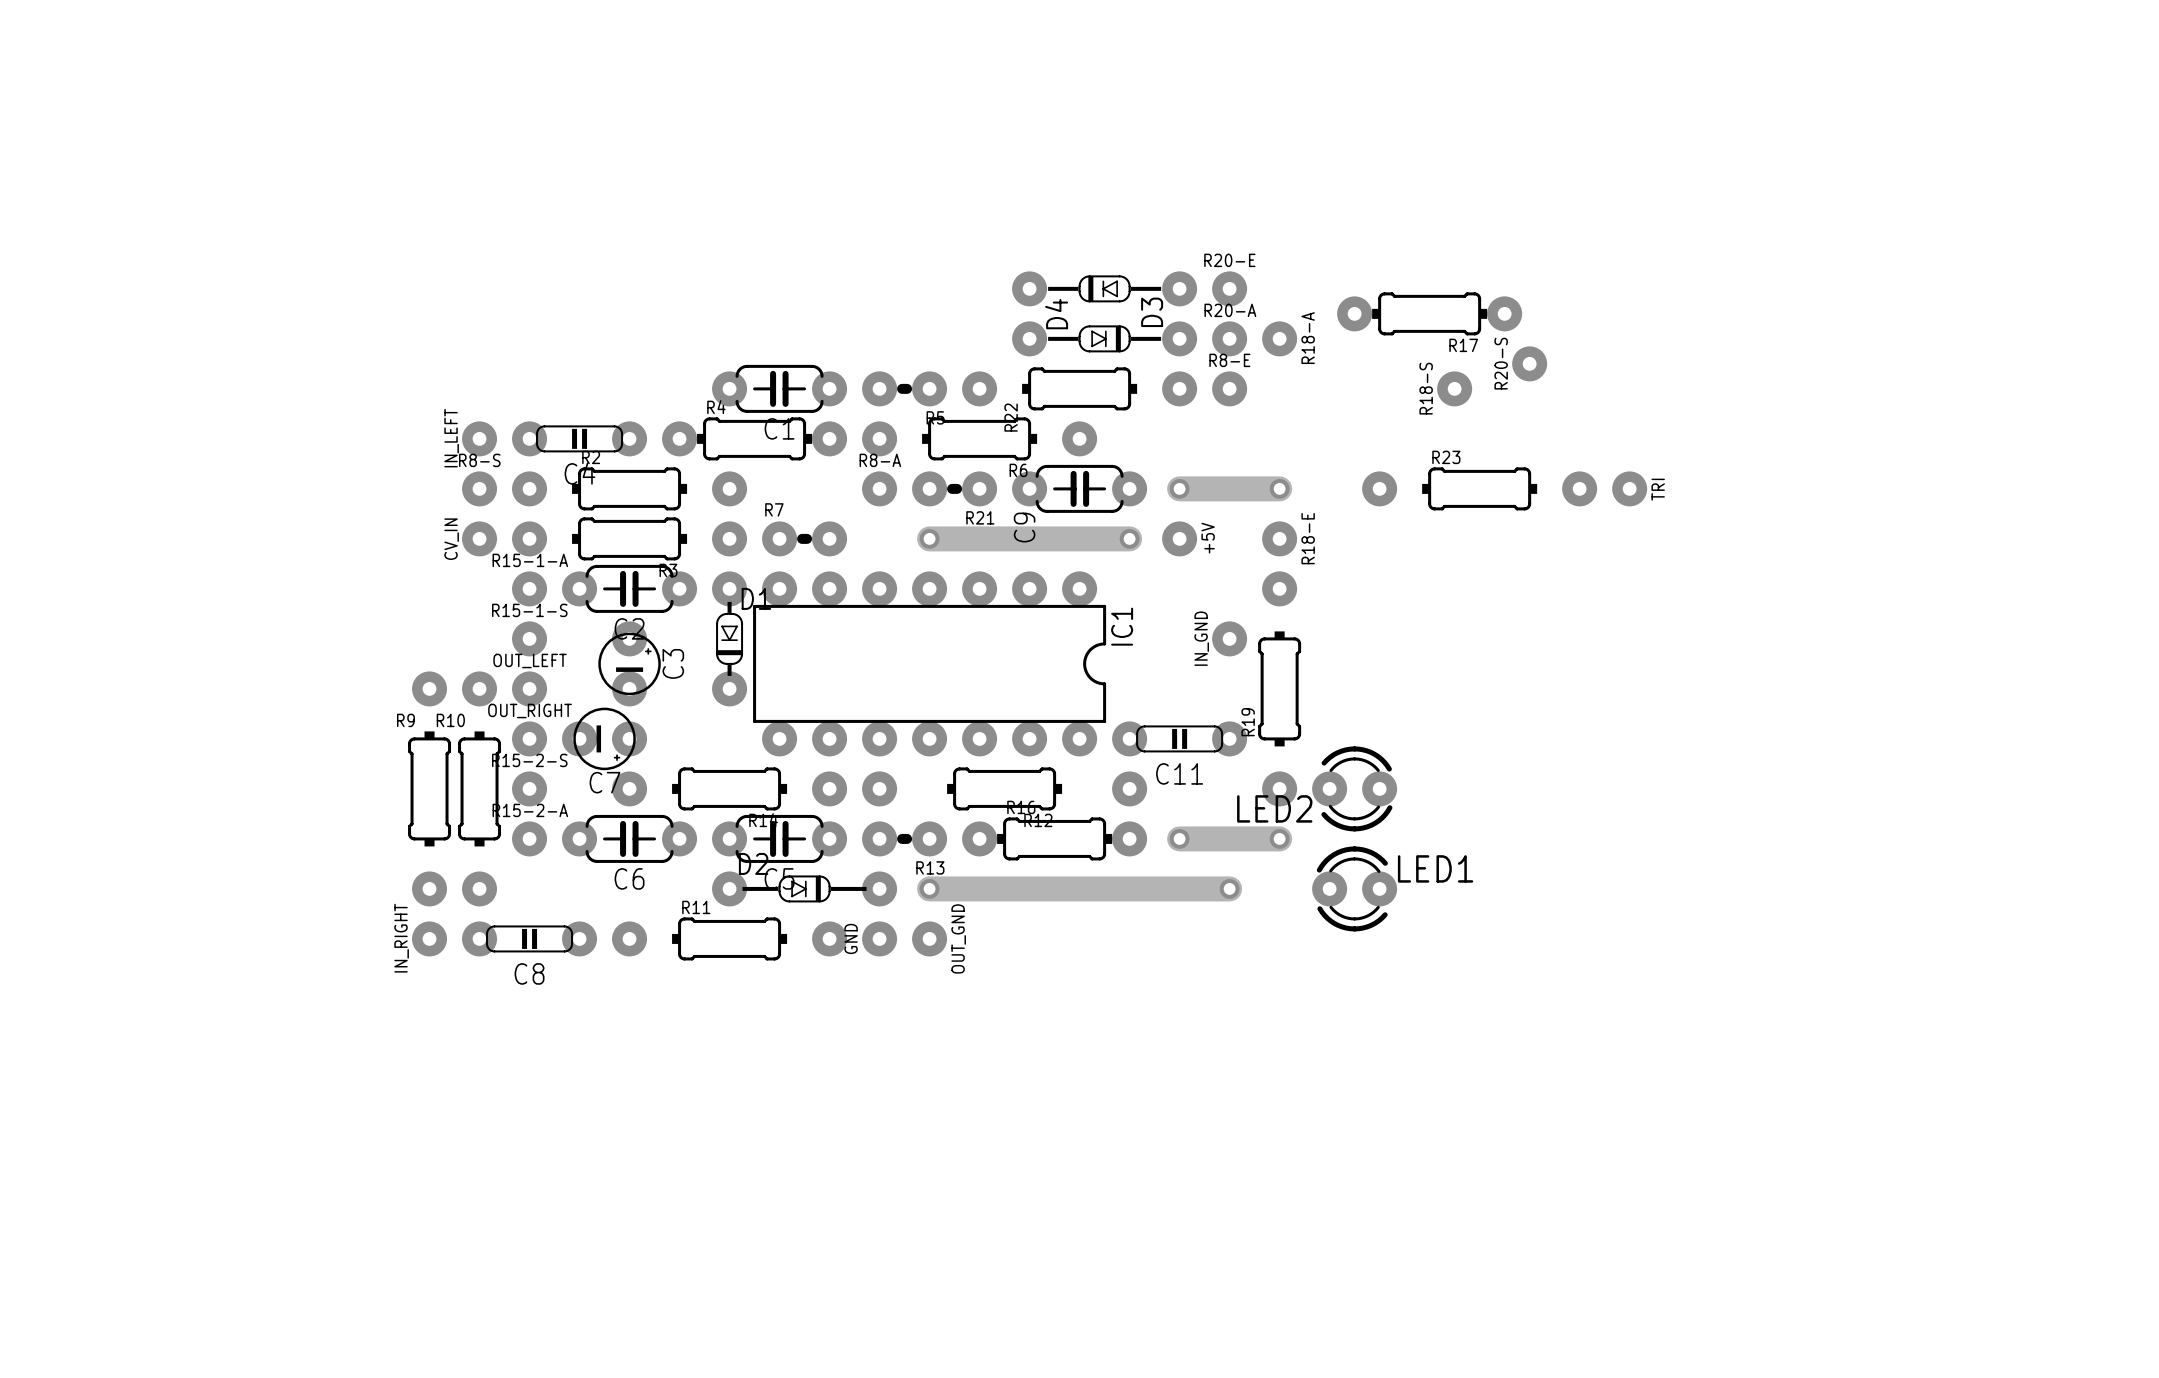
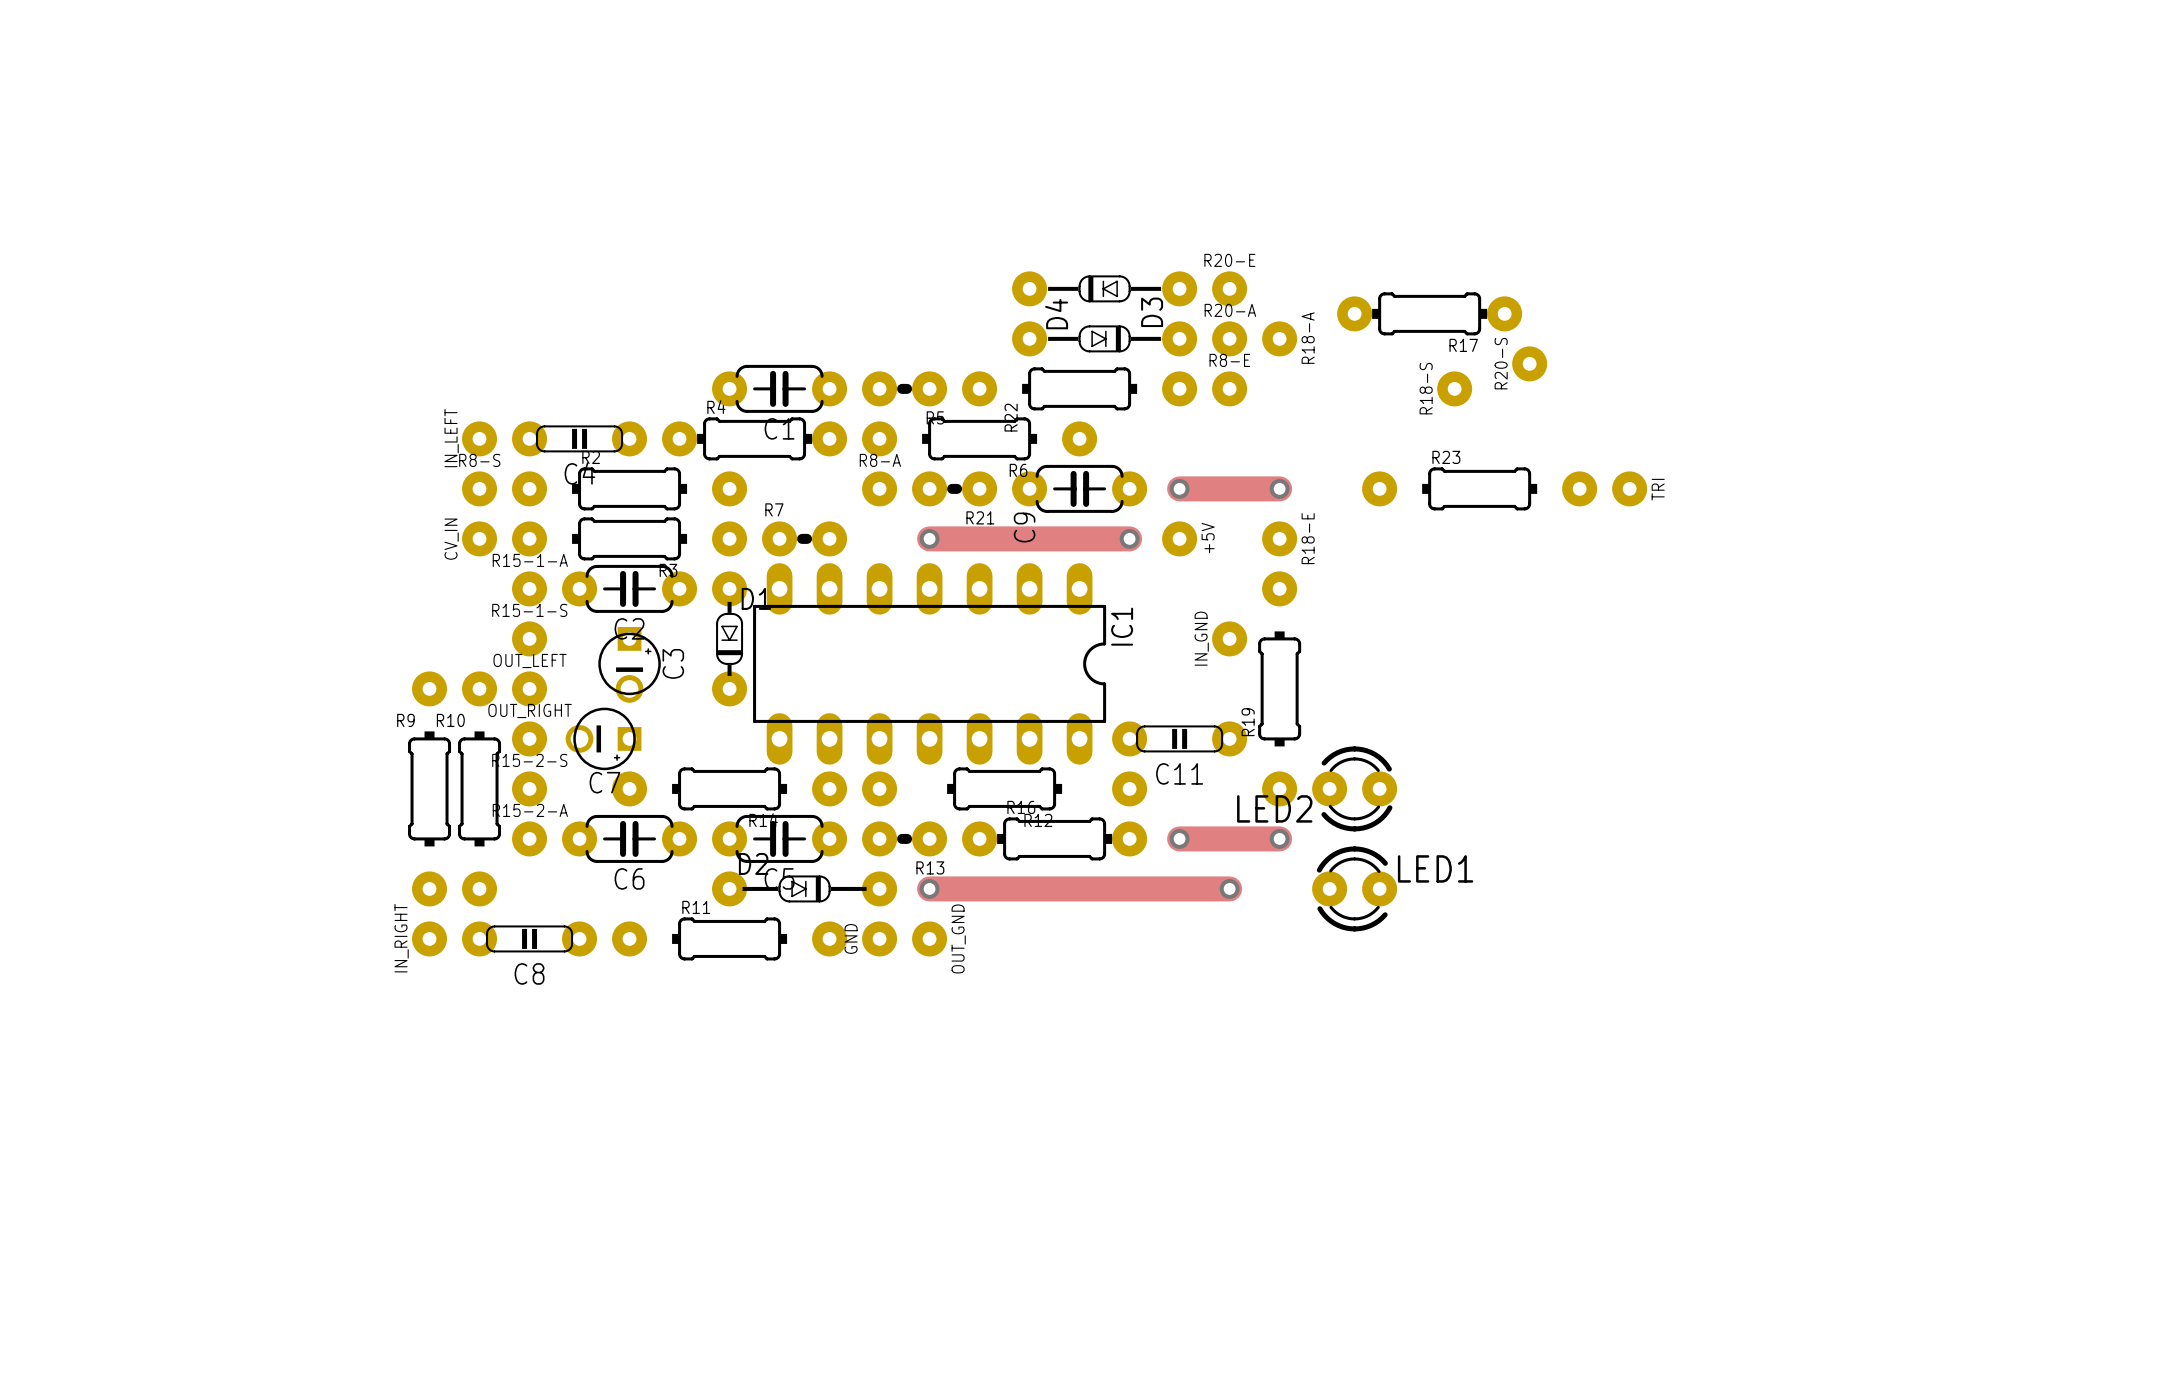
IC1 footprint: [753, 571, 1107, 757] -> [753, 563, 1107, 765]
C3 footprint: [598, 621, 661, 707] -> [598, 627, 661, 703]
C7 footprint: [562, 707, 648, 771] -> [565, 707, 642, 771]

